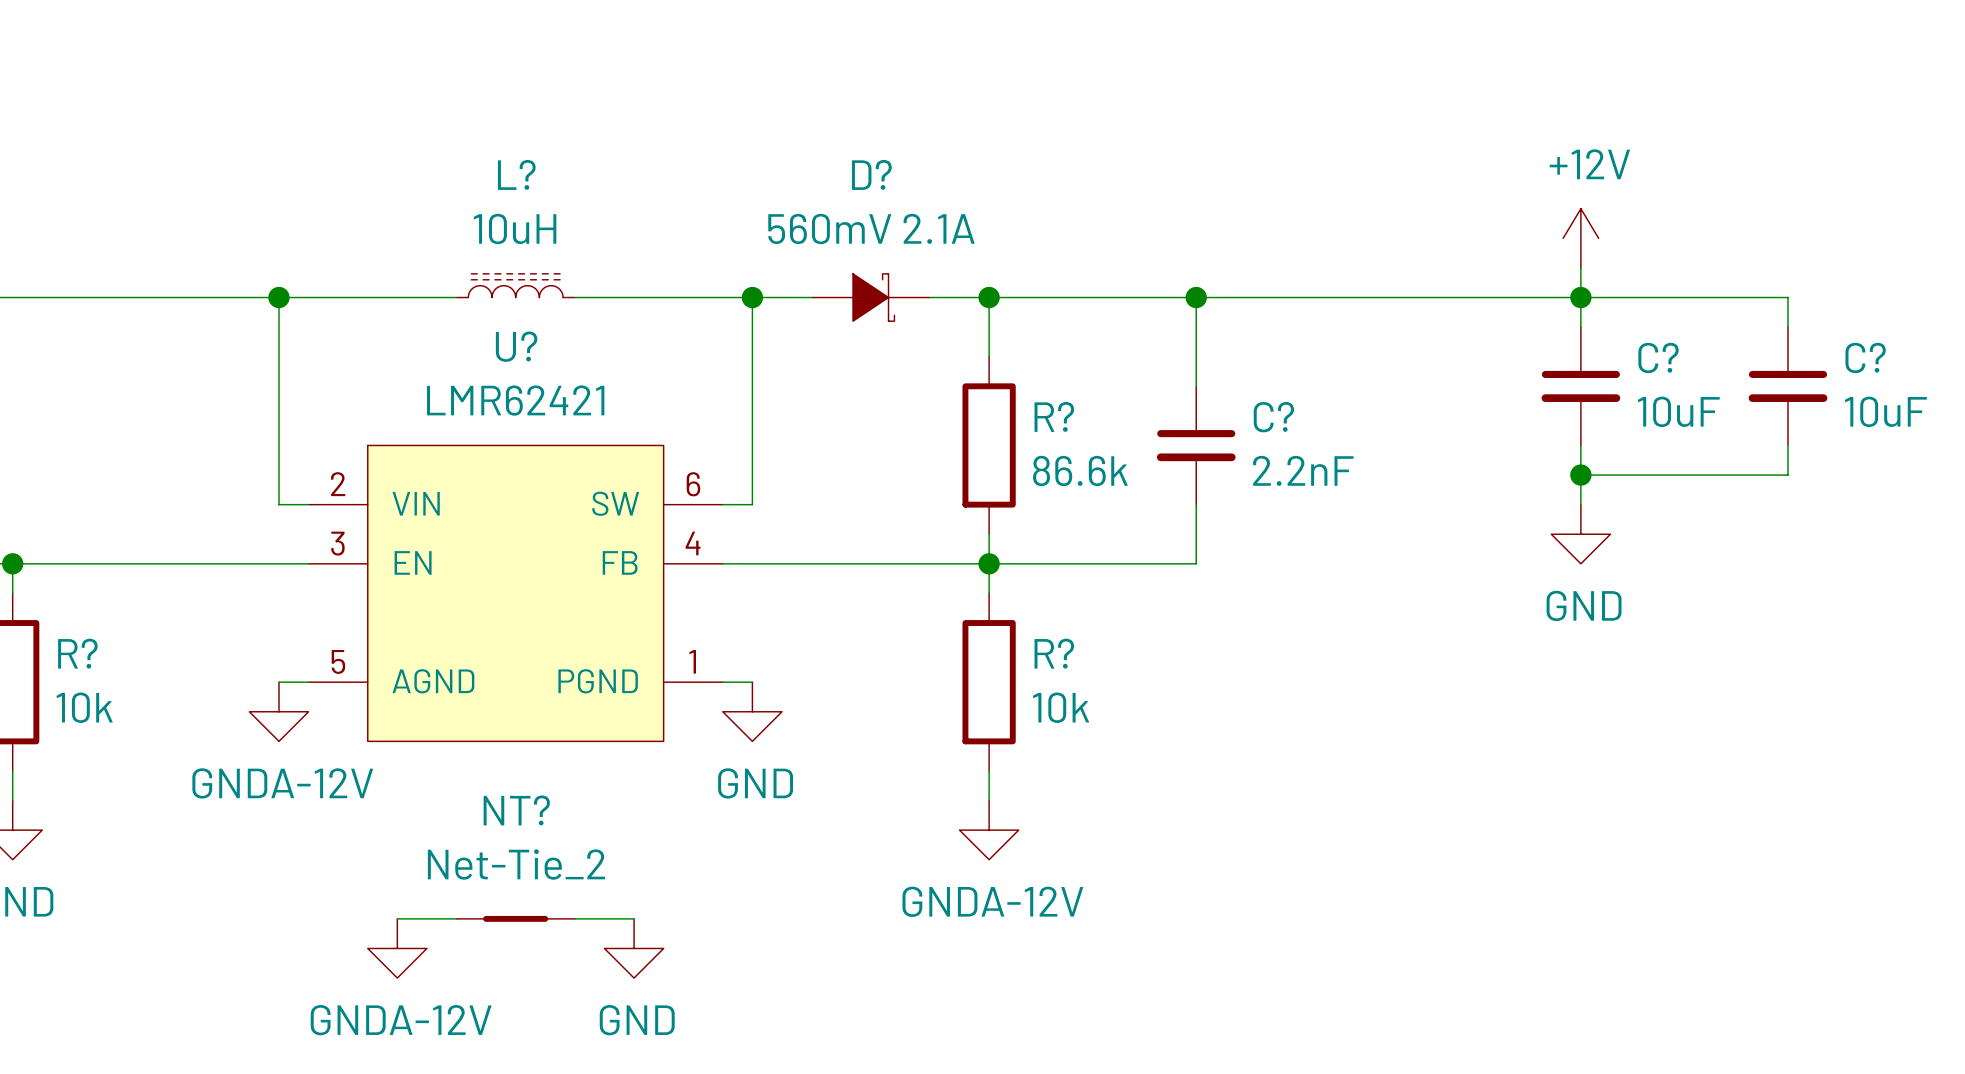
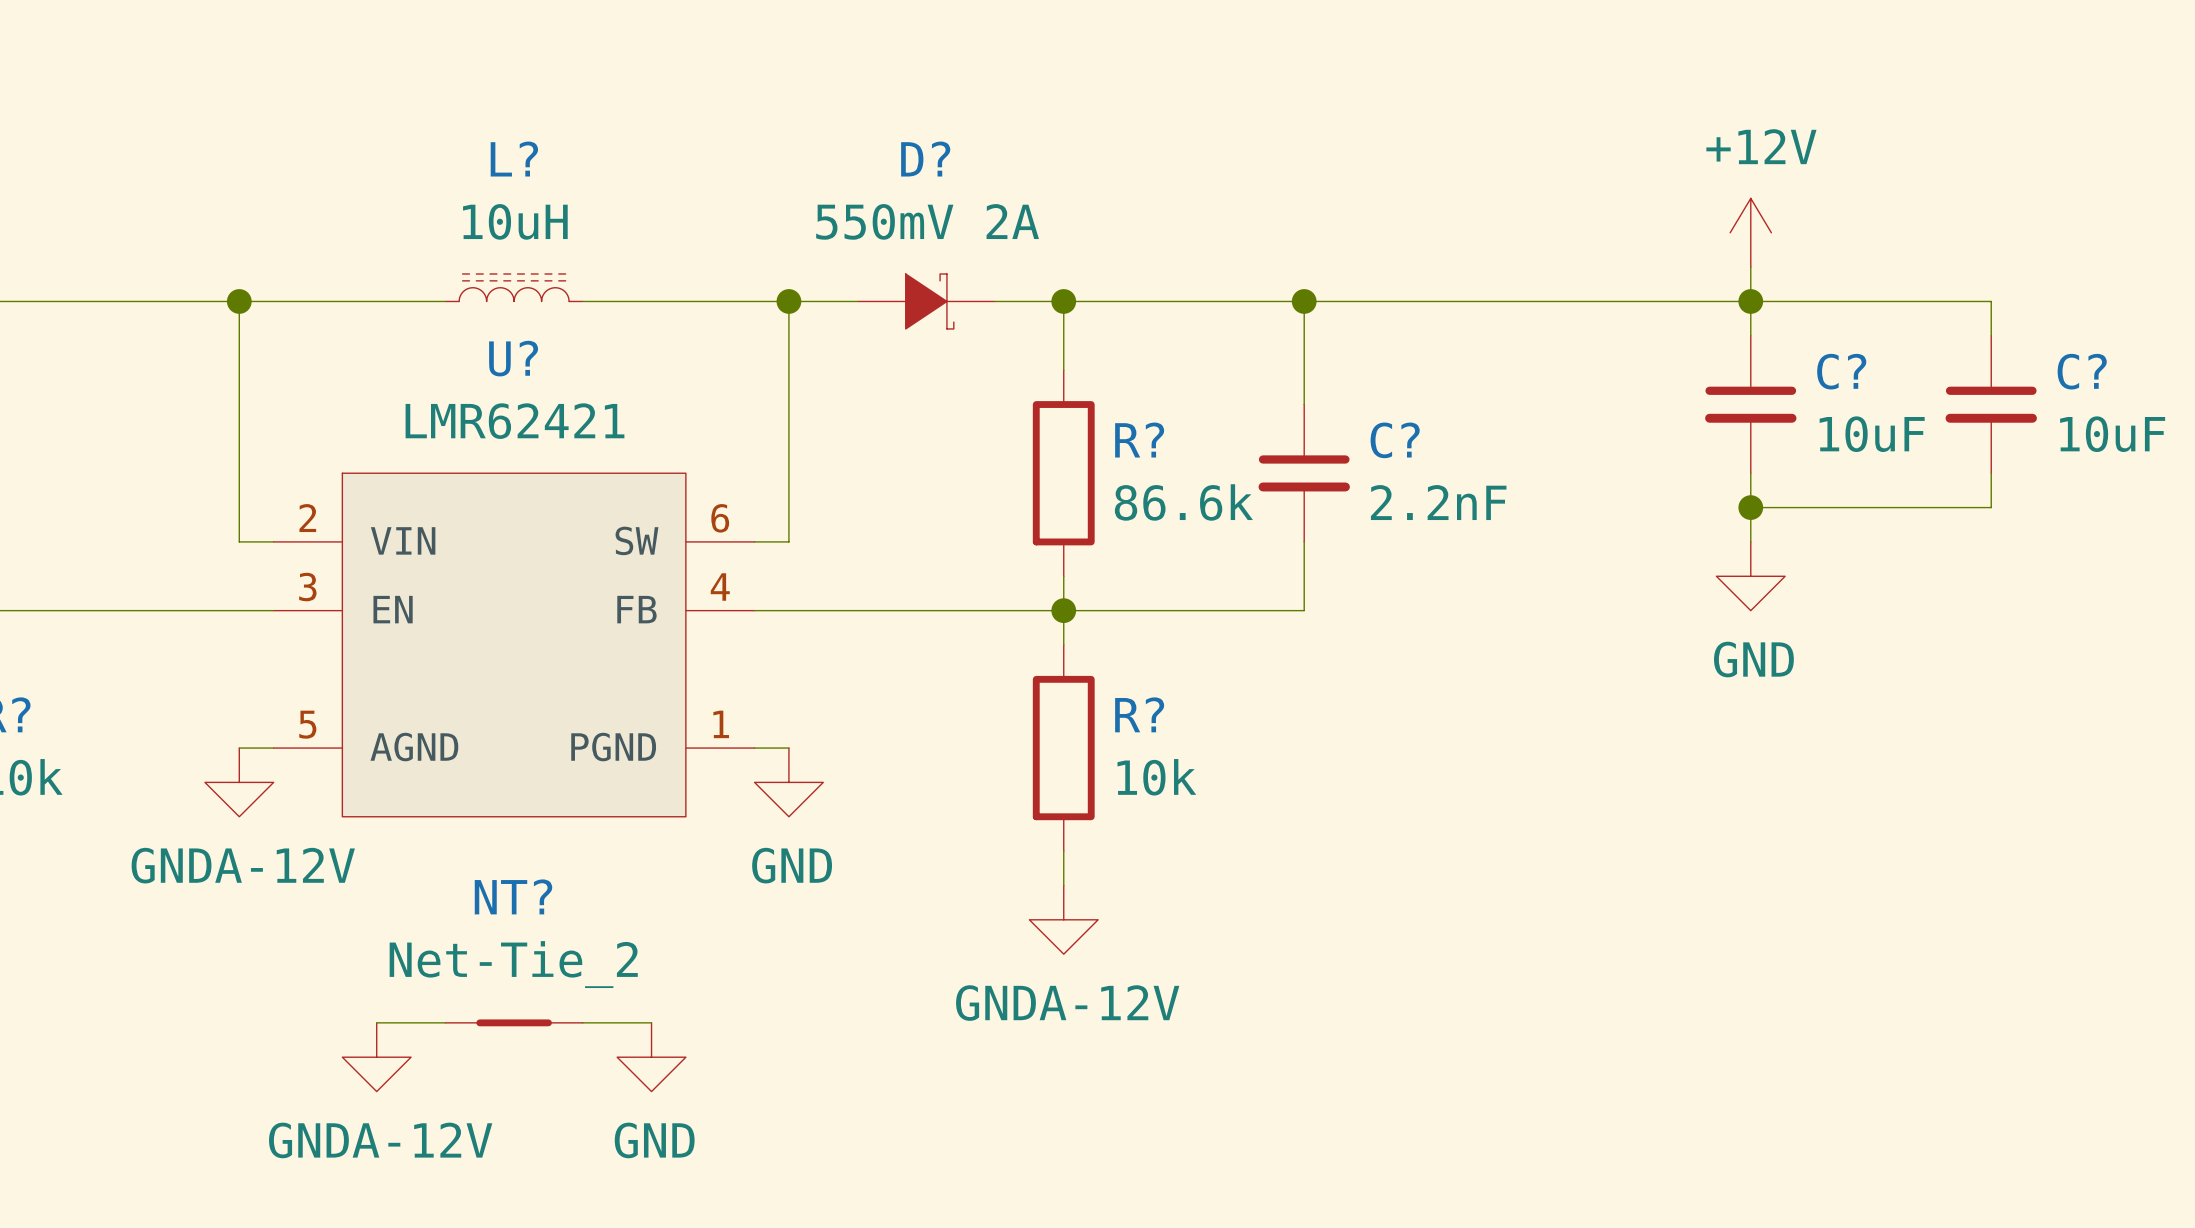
D? value: 560mV 2.1A (871, 228) -> 550mV 2A (927, 221)

